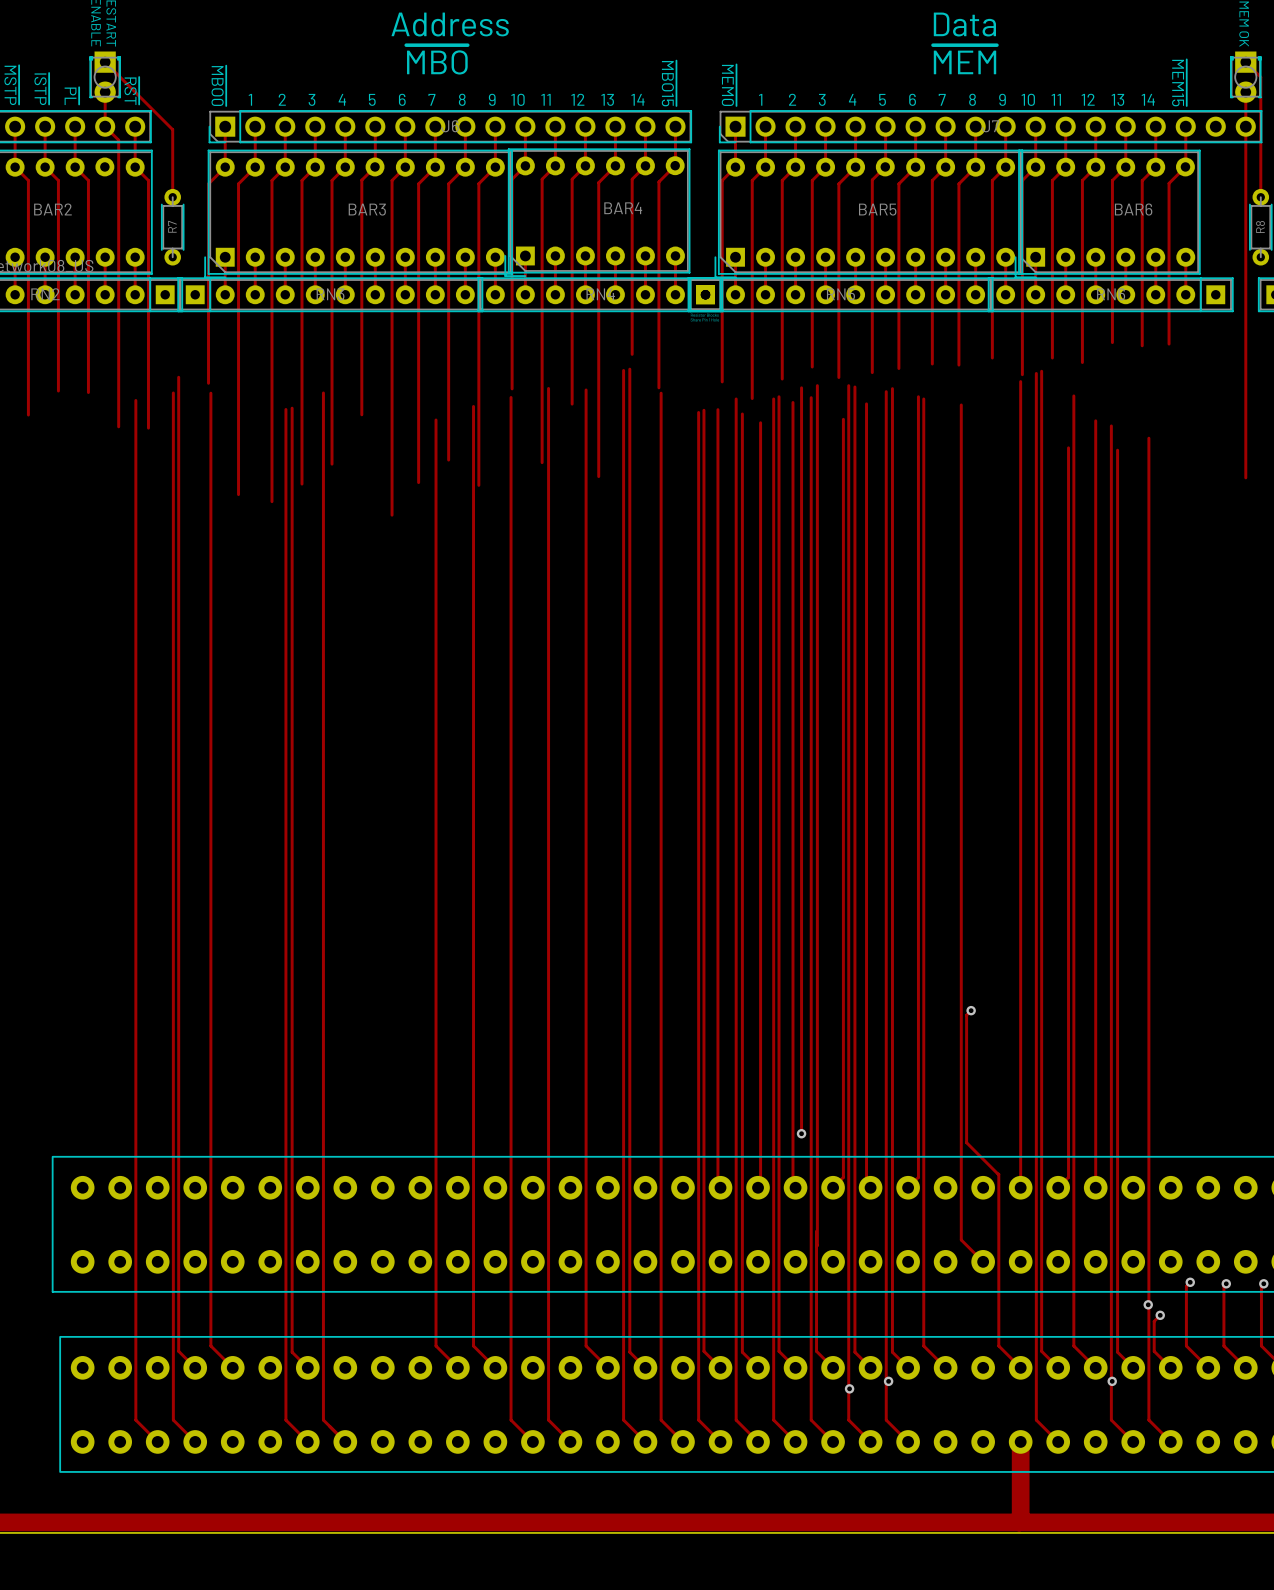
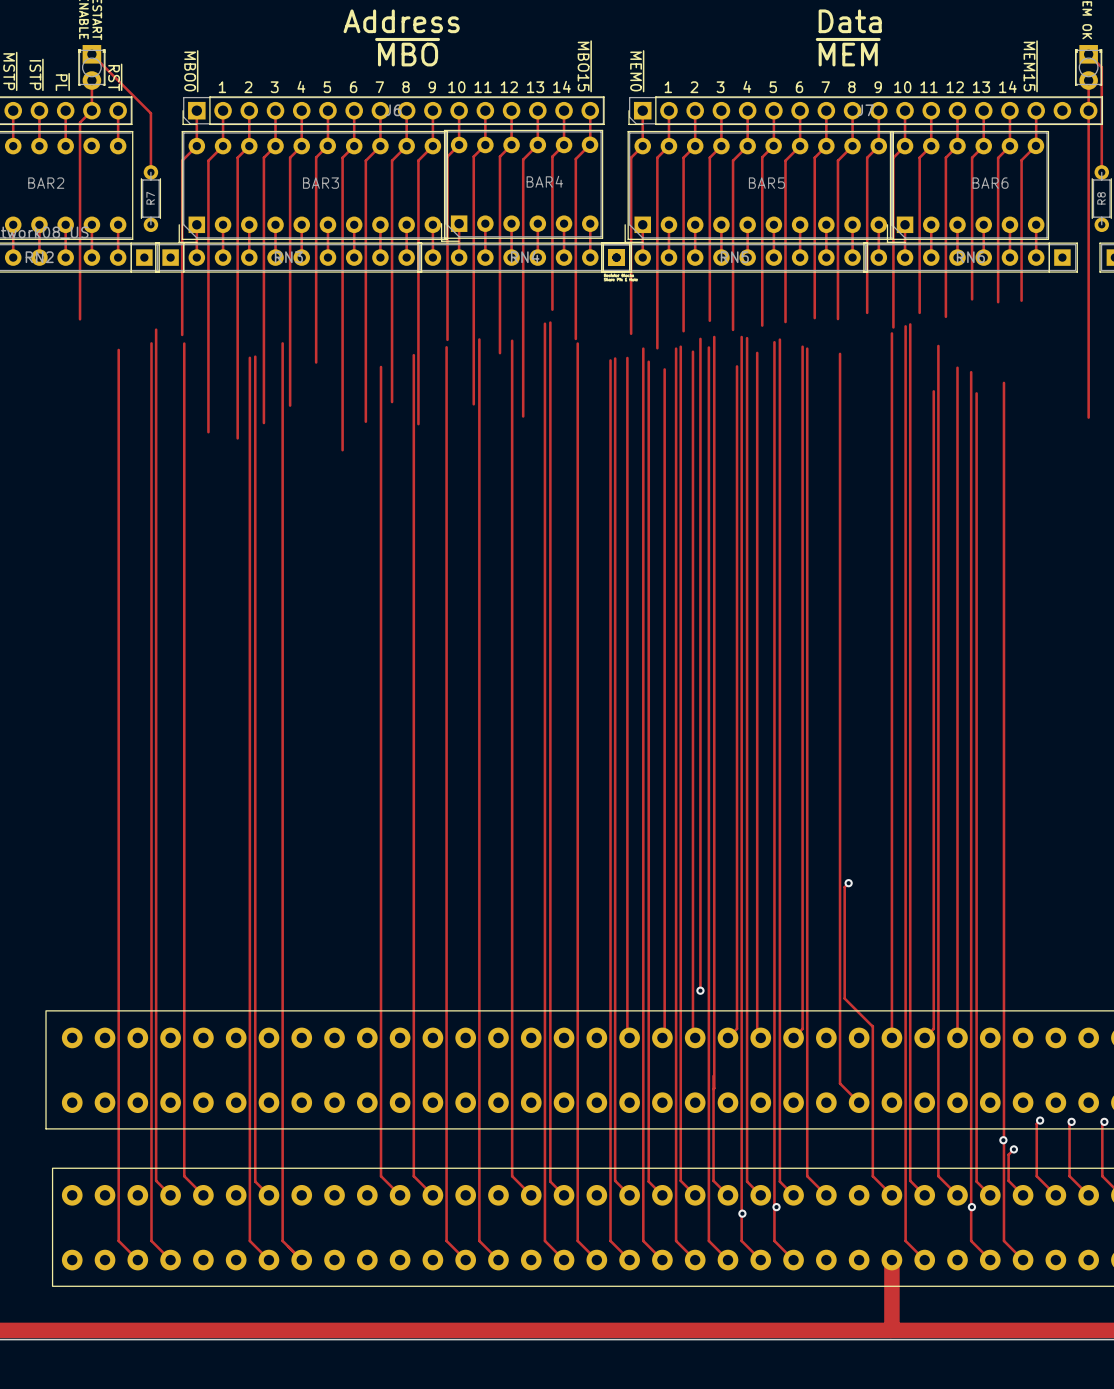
track: (105, 126) (118, 140) (118, 426) -> (91, 110) (80, 122) (80, 319)
track: (15, 167) (28, 180) (28, 415) -> none
track: (45, 167) (58, 180) (58, 391) -> none
track: (75, 167) (88, 180) (88, 392) -> none
track: (135, 167) (148, 180) (148, 428) -> none

